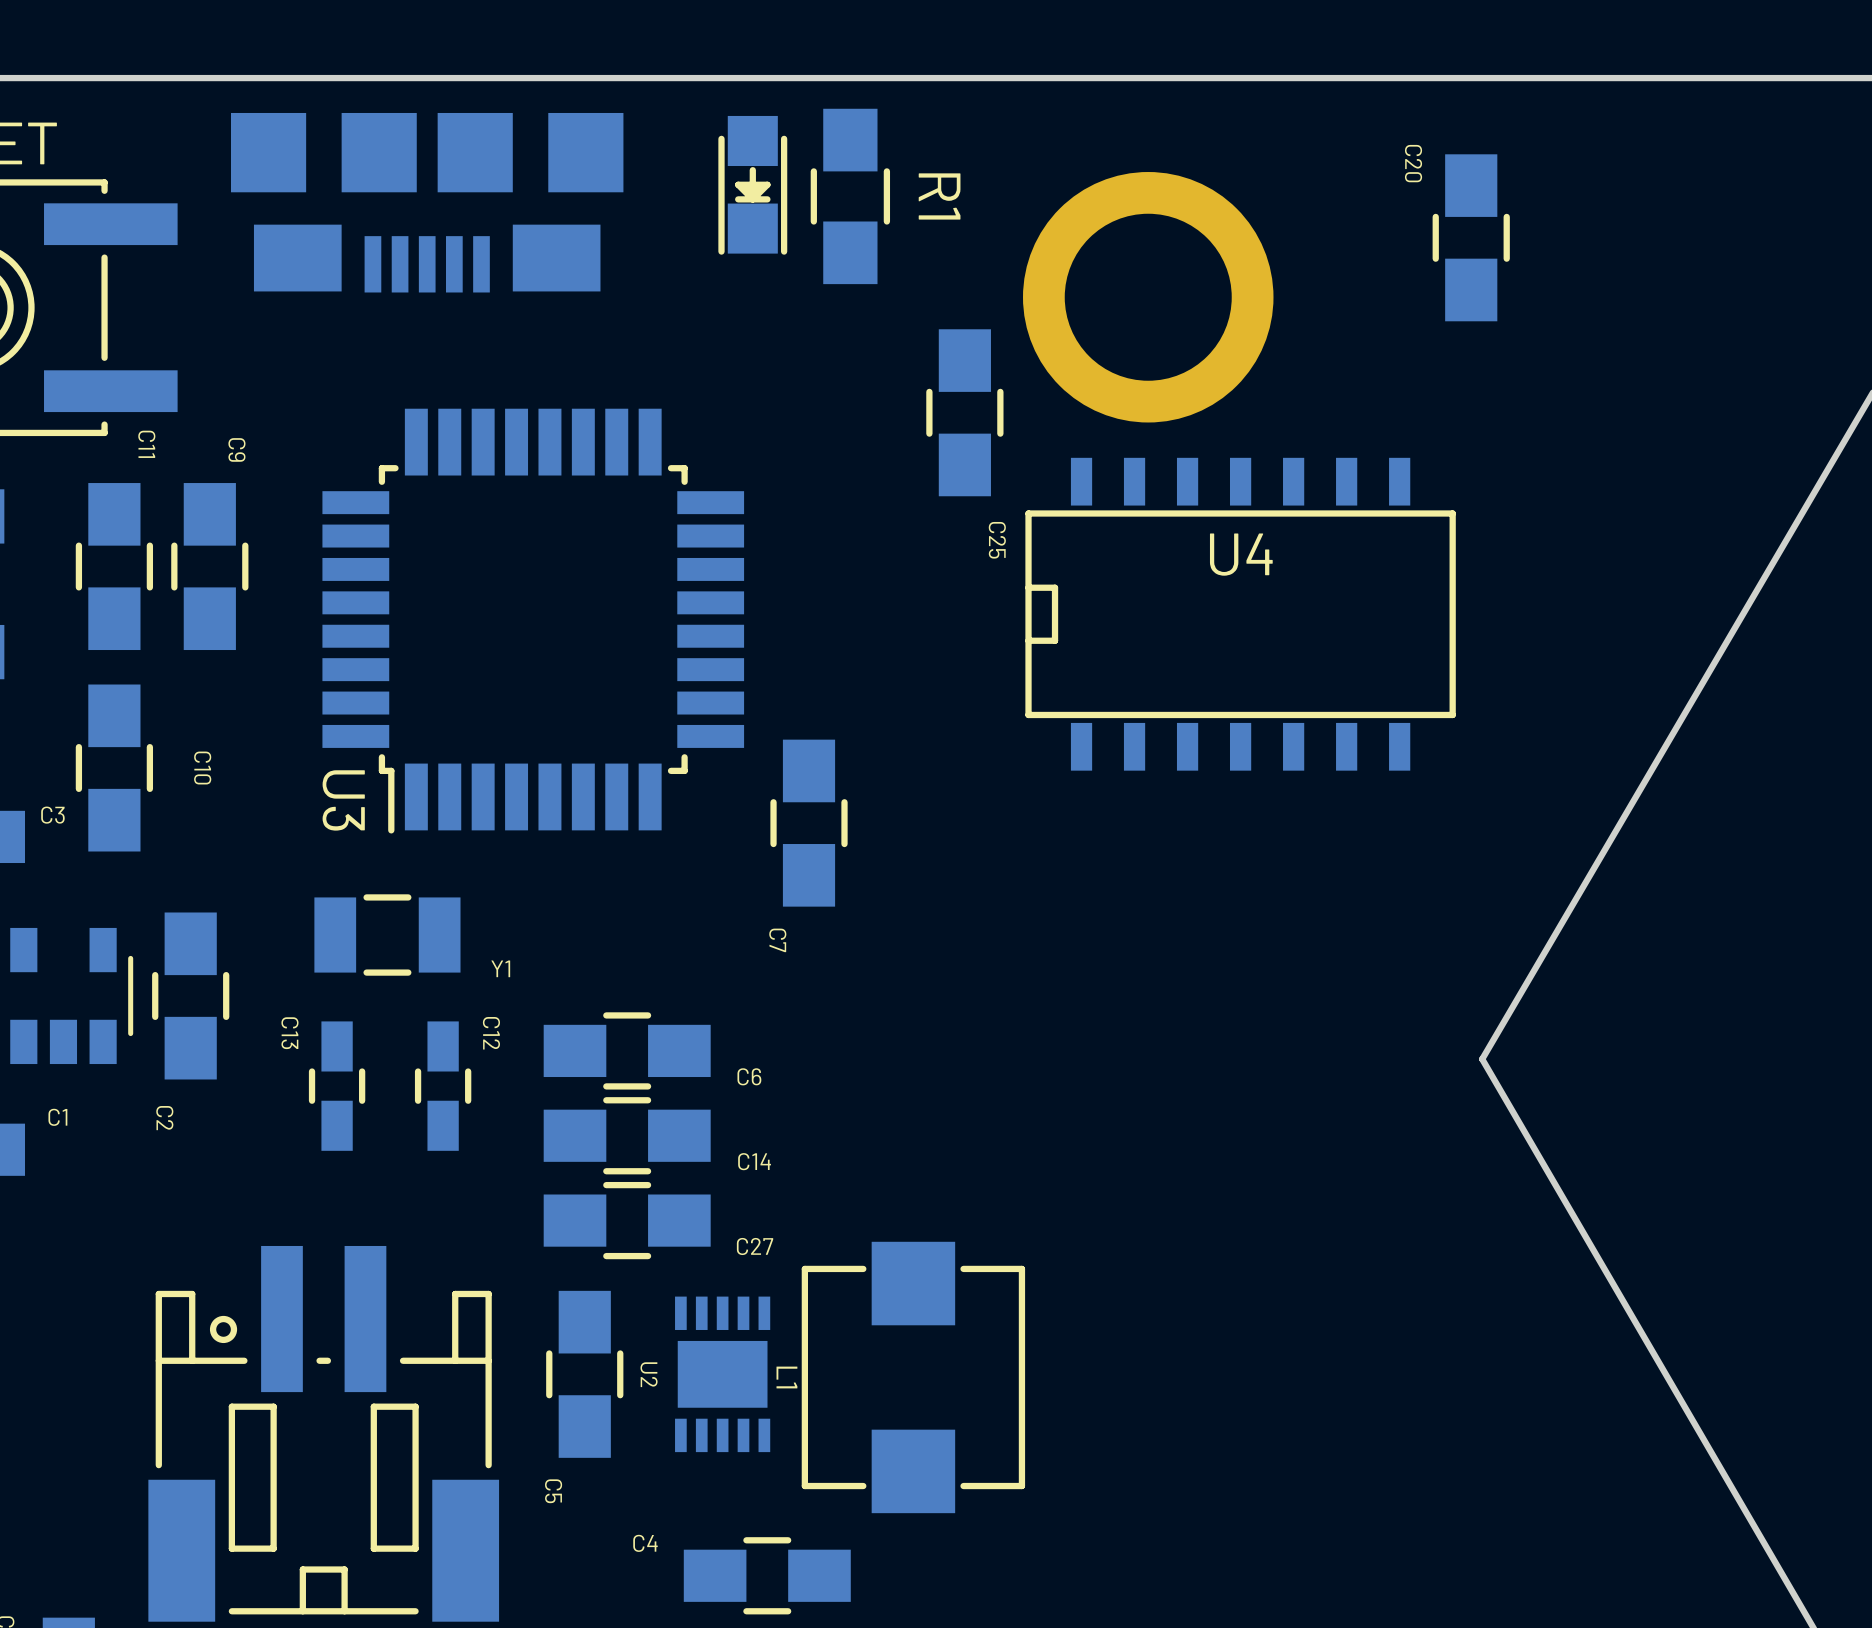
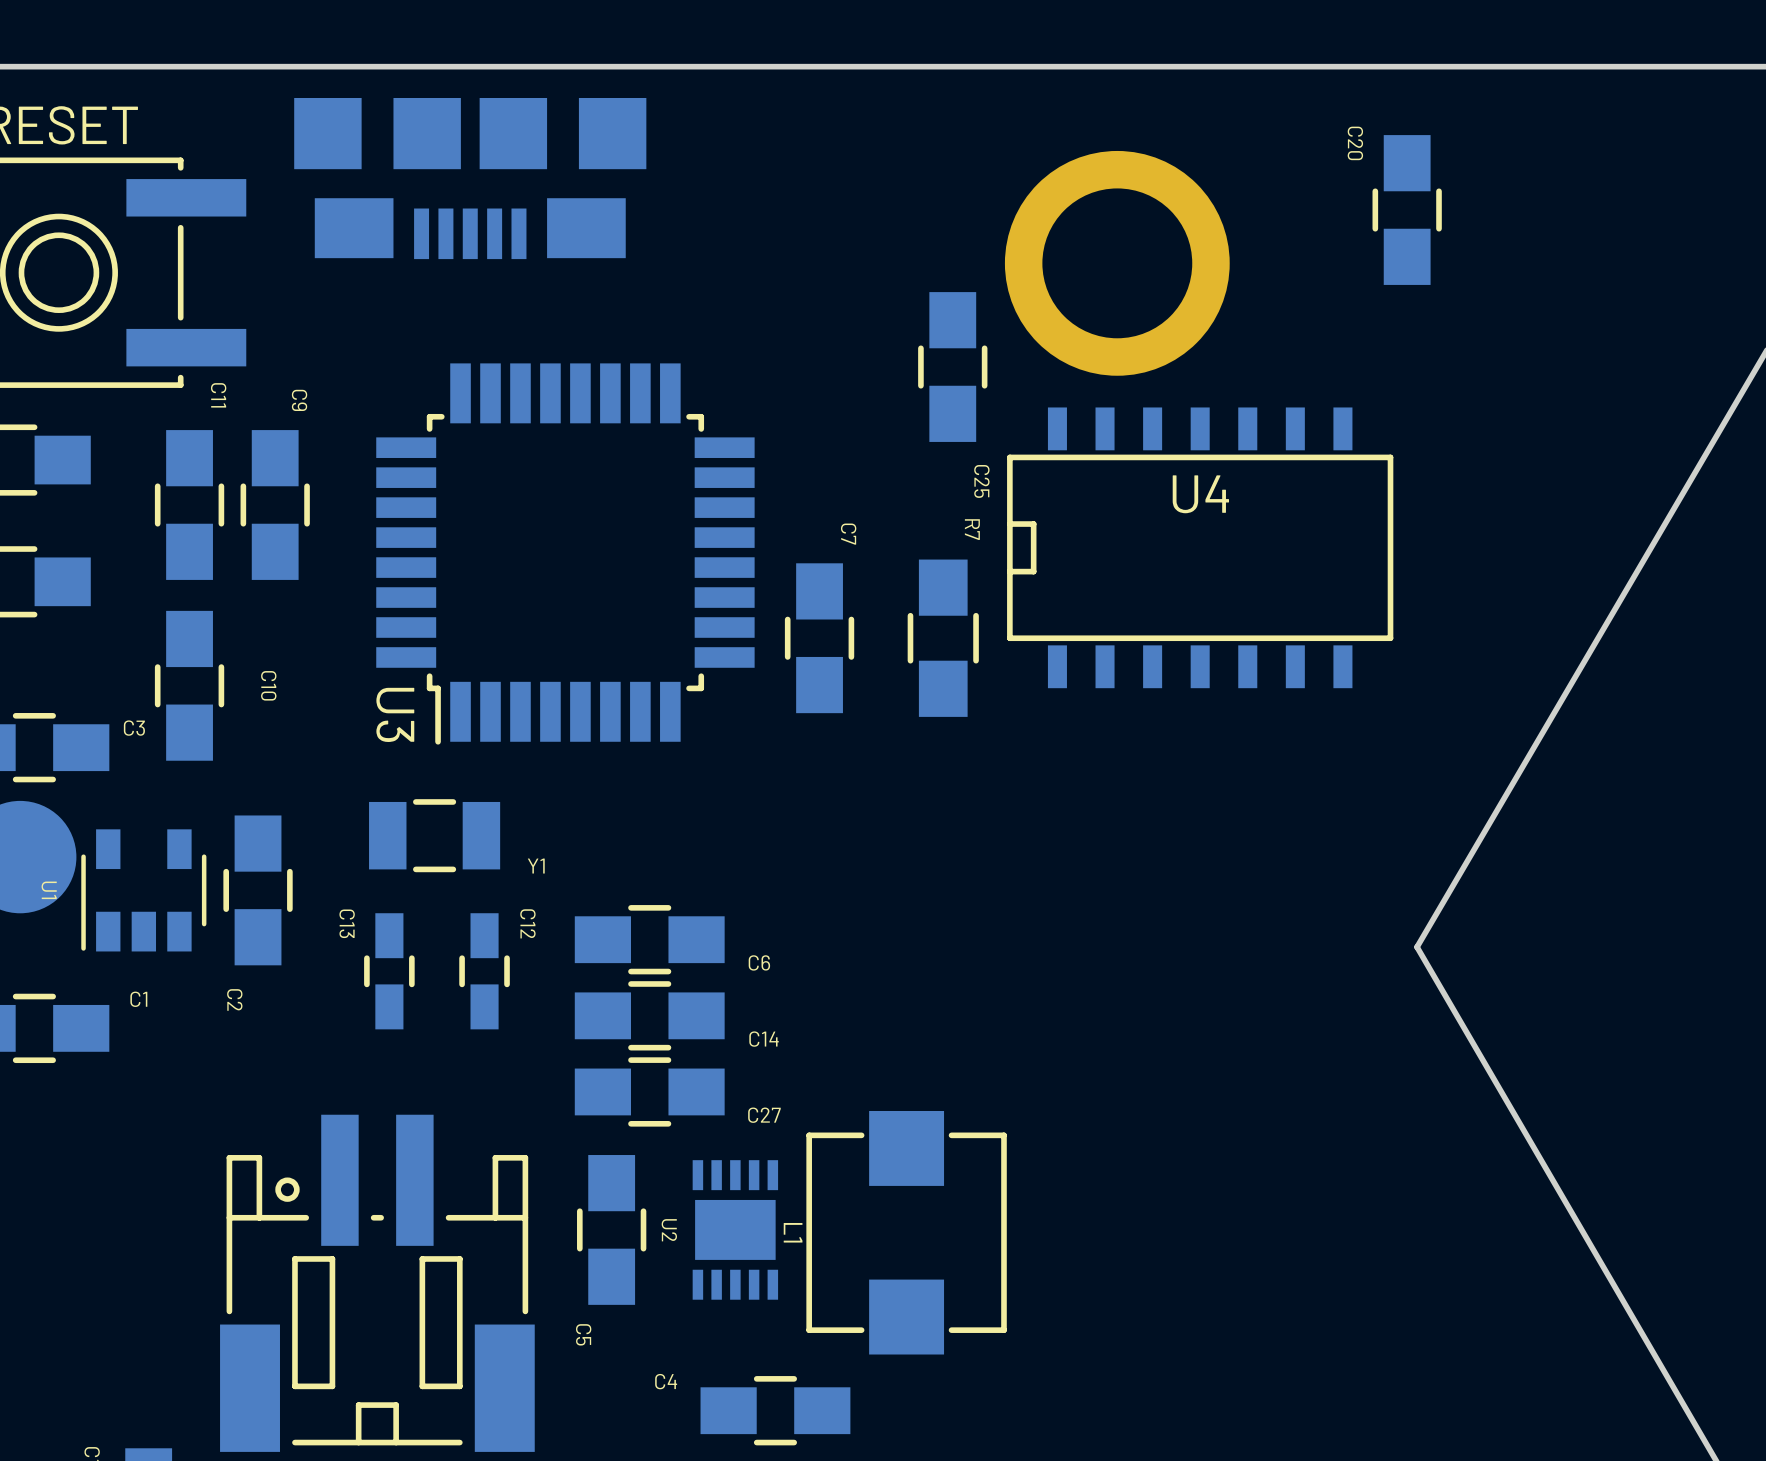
part: (752, 185) -> none
R1: (850, 196) -> none
R7: none -> (943, 638)
C7 position: (809, 823) -> (819, 638)
C7 name position: C7 (777, 940) -> C7 (848, 534)

